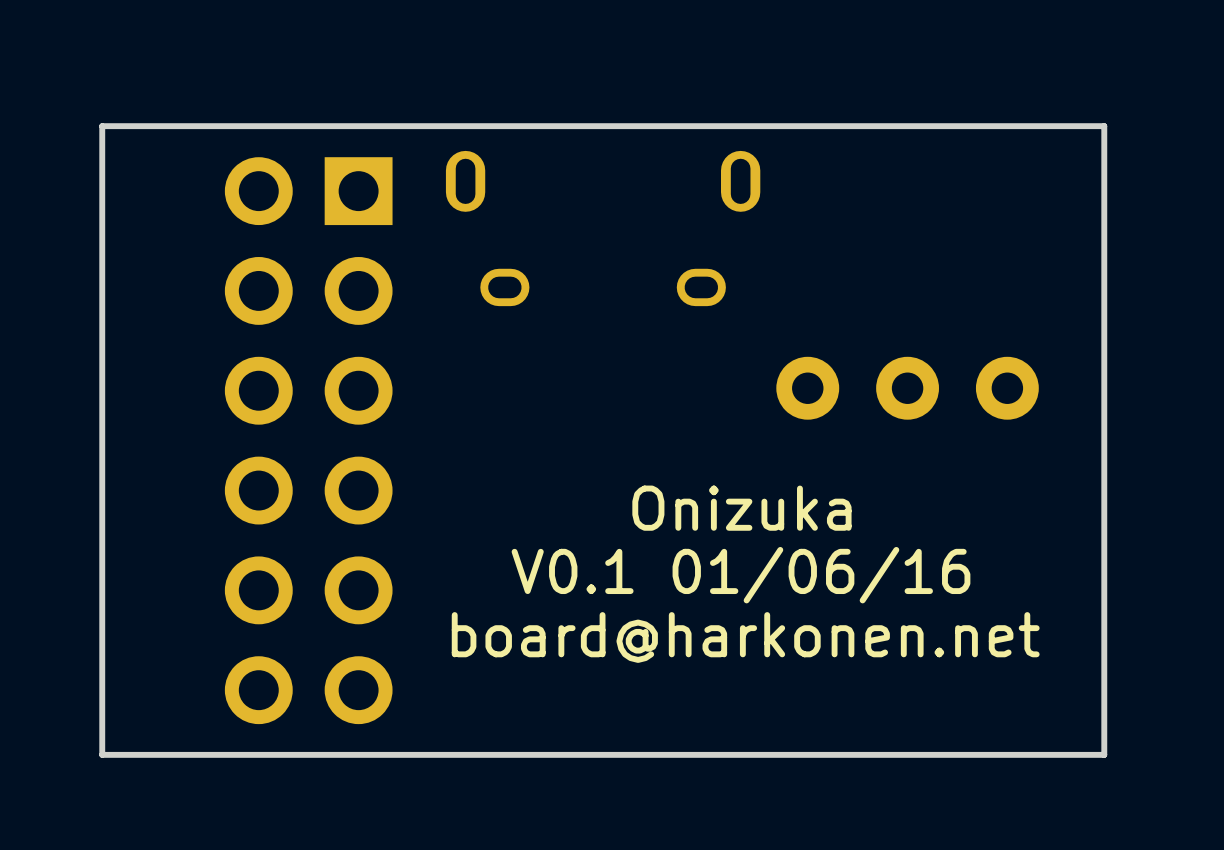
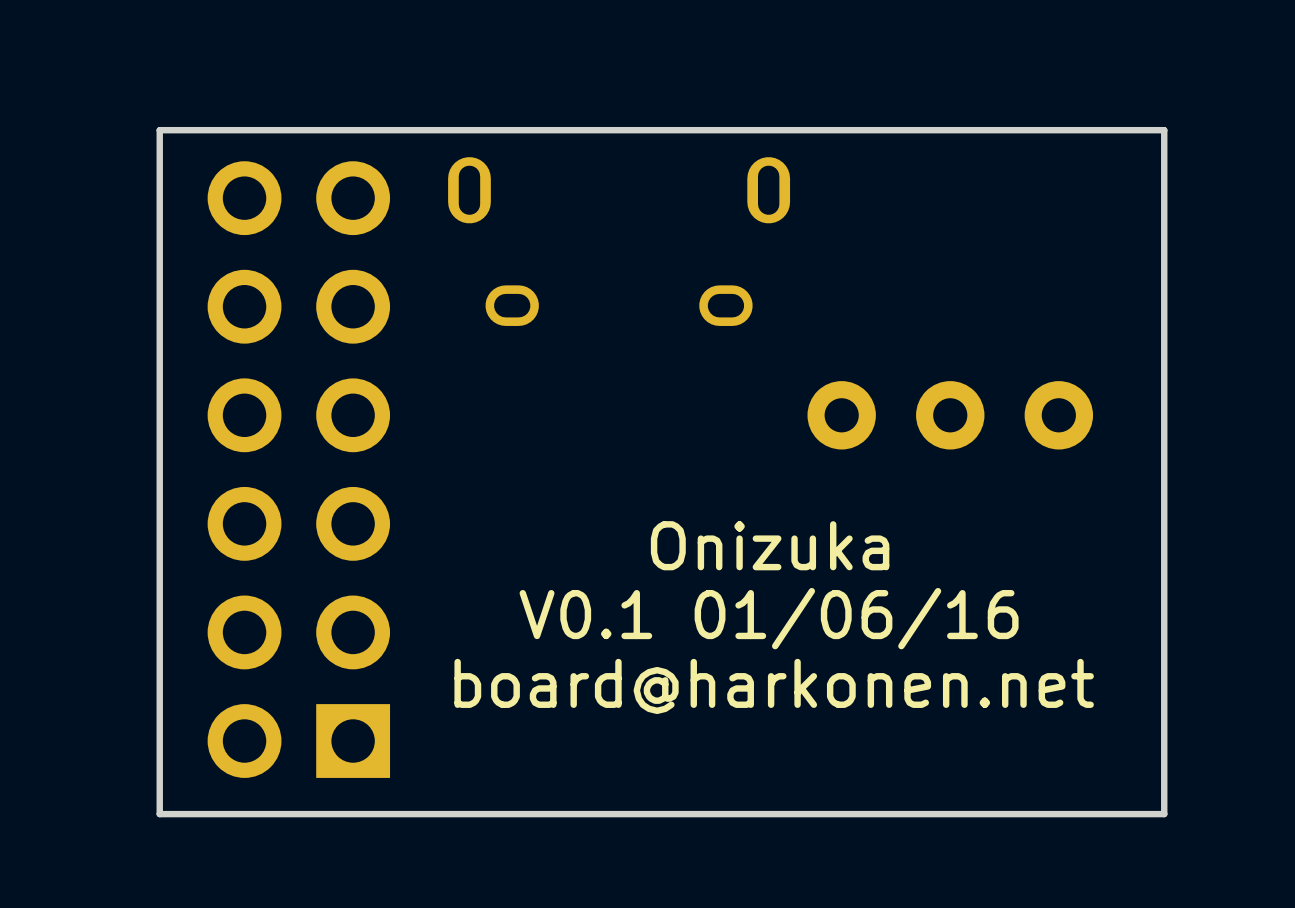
board edge: (180, 126) (102, 126) (102, 754) (180, 754) -> (159, 130) (159, 814)
part footprint: [224, 157, 393, 725] -> [207, 161, 391, 778]

